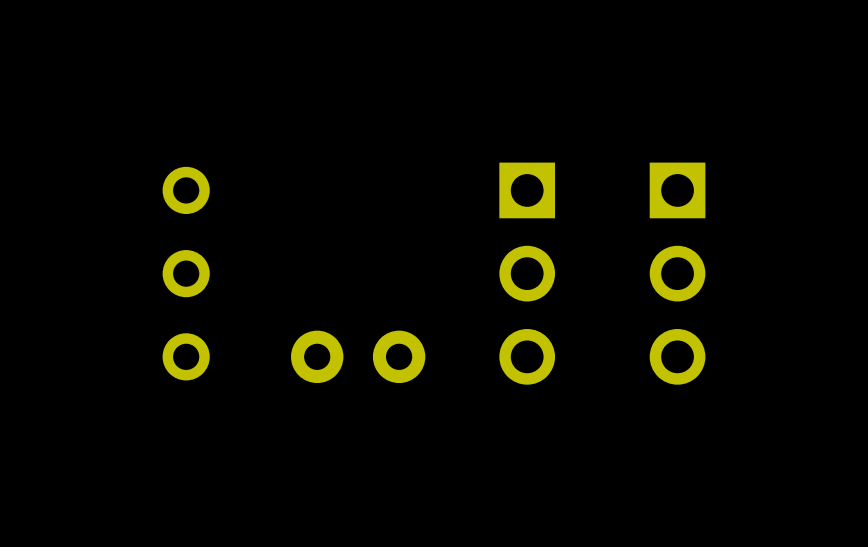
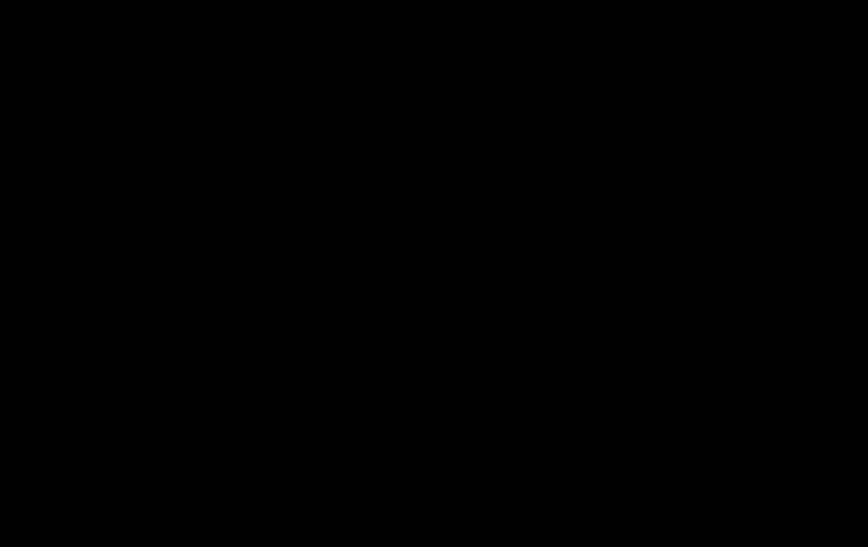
part: (186, 273) -> none
part: (527, 273) -> none
part: (677, 273) -> none
part: (358, 356) -> none

